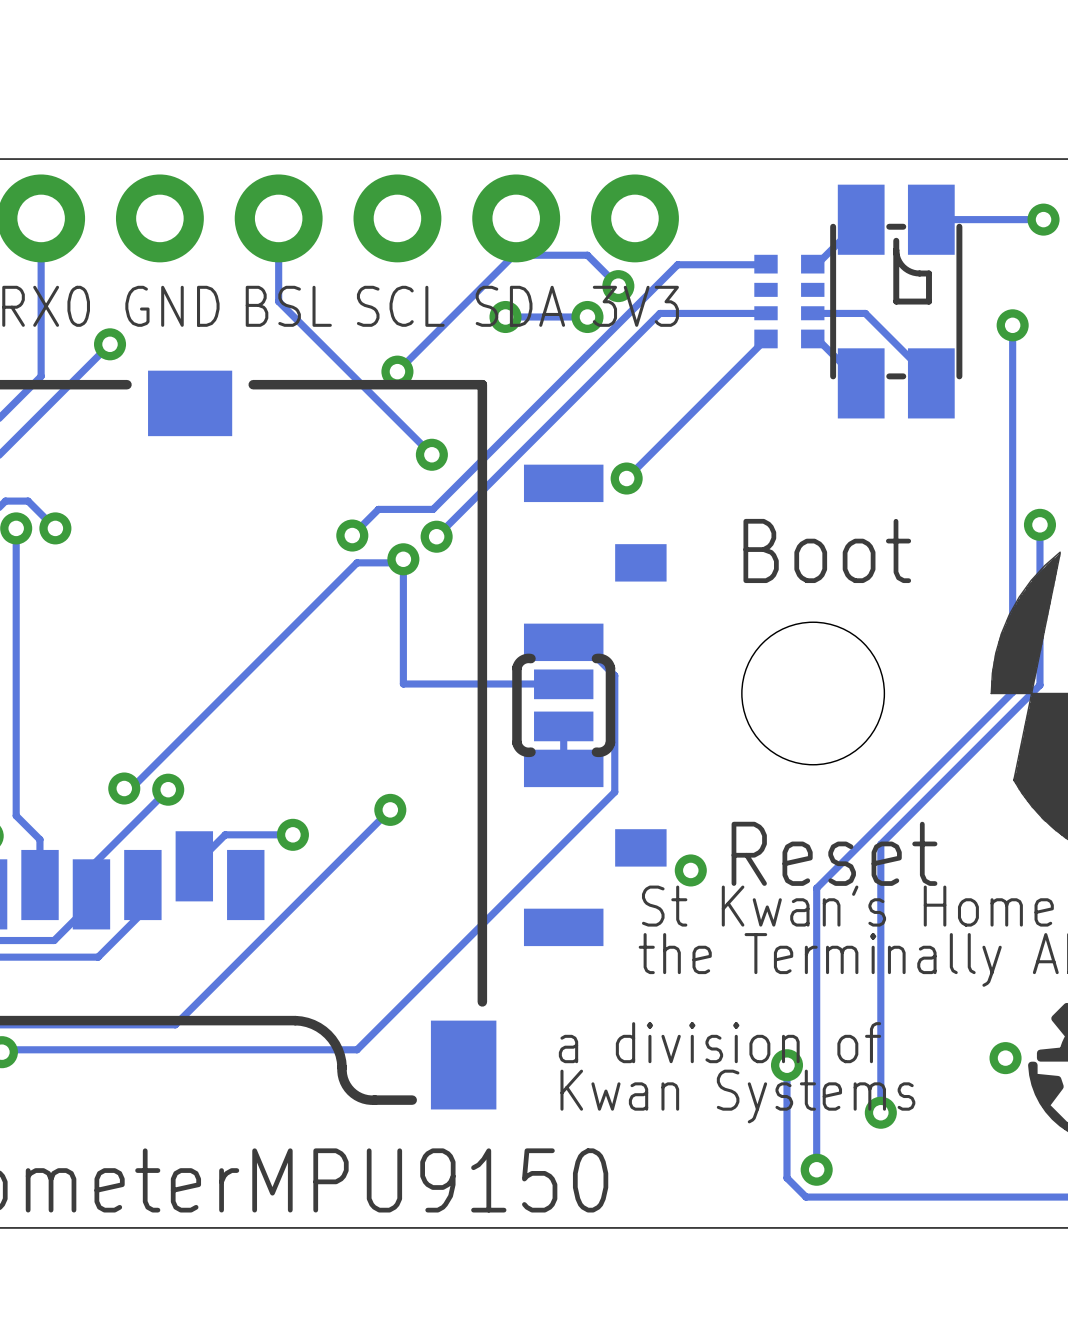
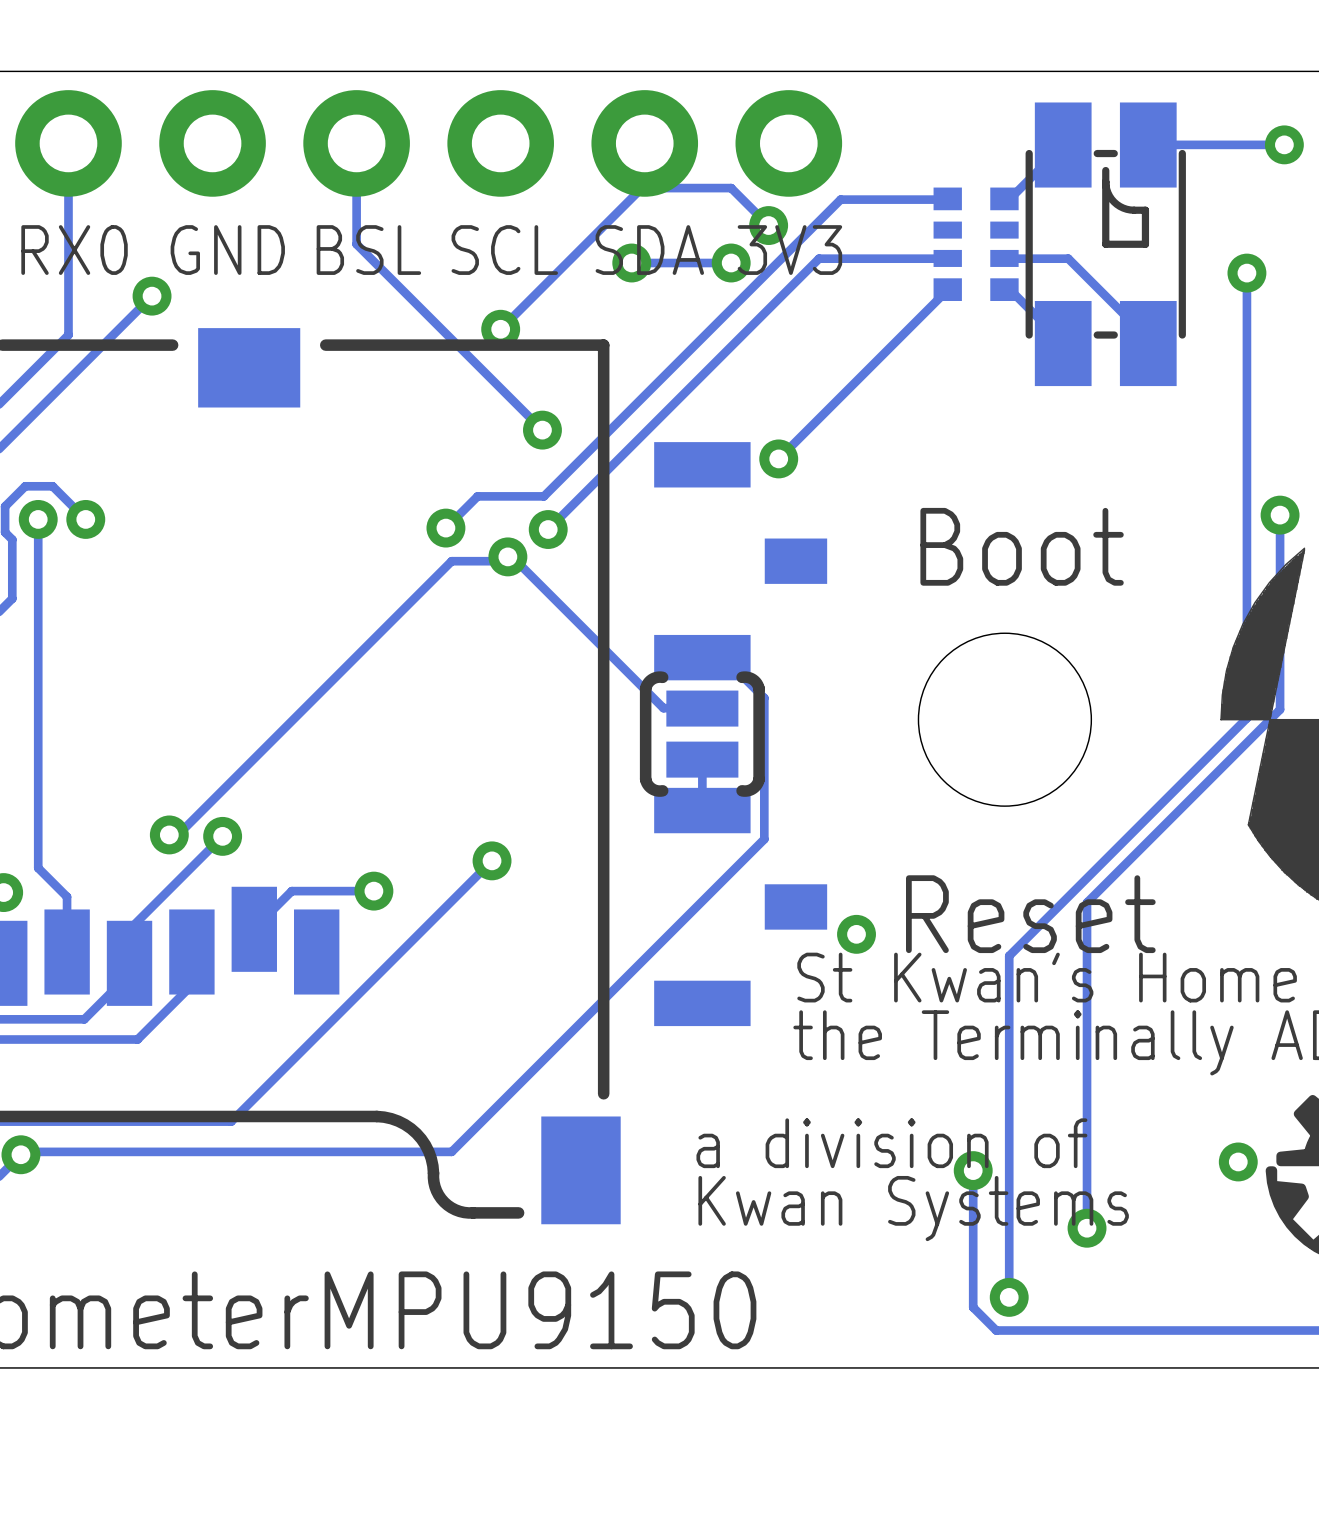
track: (403, 559) (403, 683) (531, 683) -> (507, 561) (510, 561) (507, 556) (512, 556) (663, 708)

